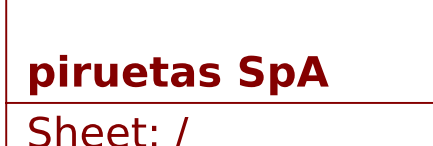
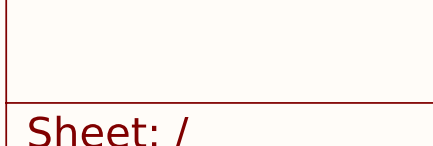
title block: piruetas SpA (179, 75) -> none

